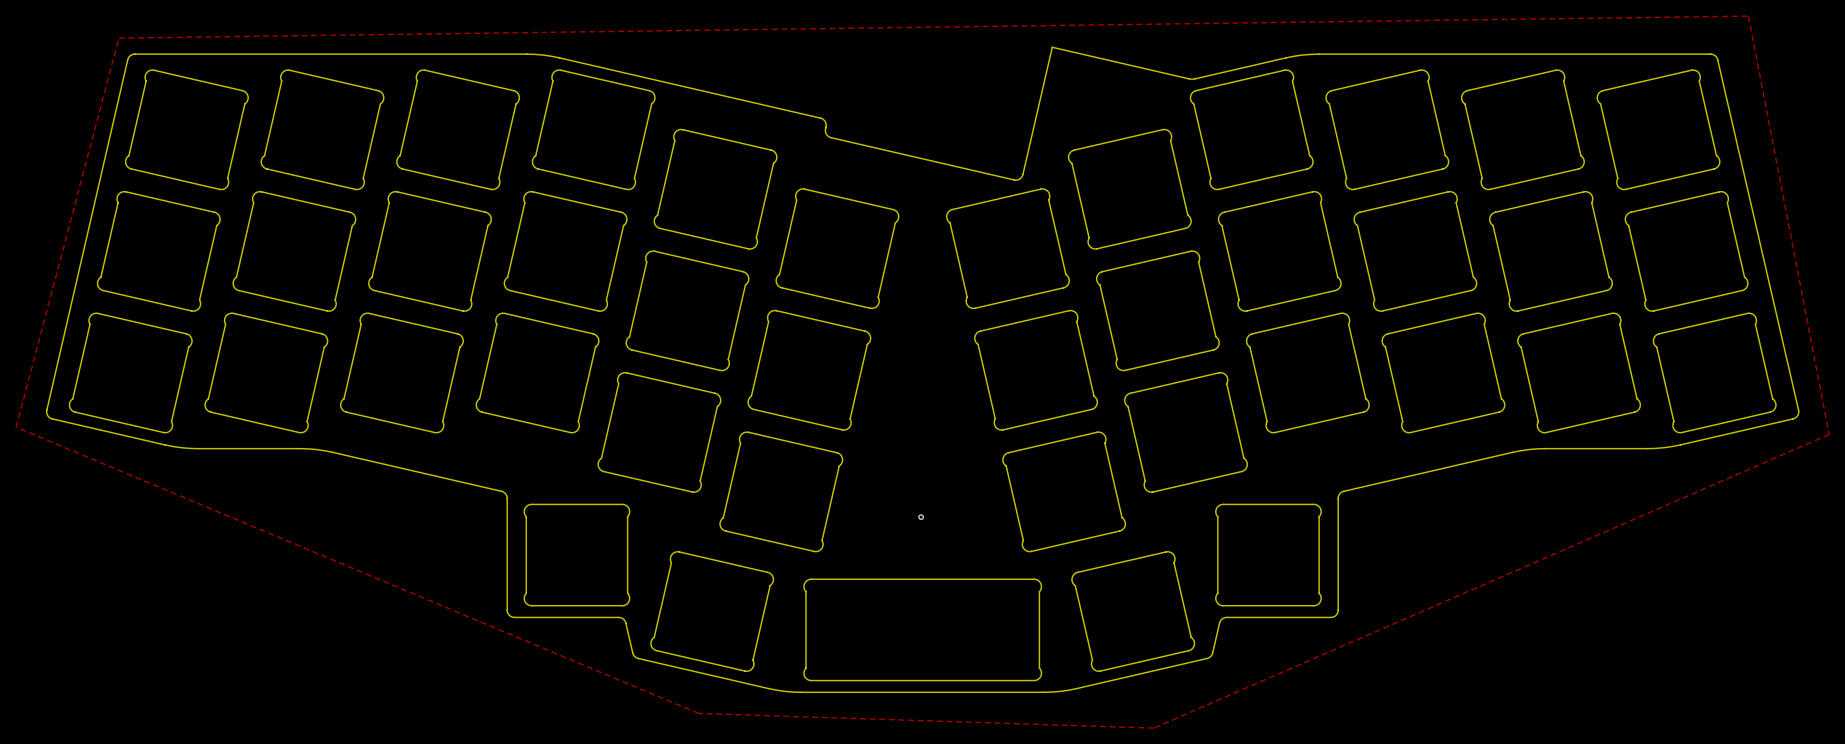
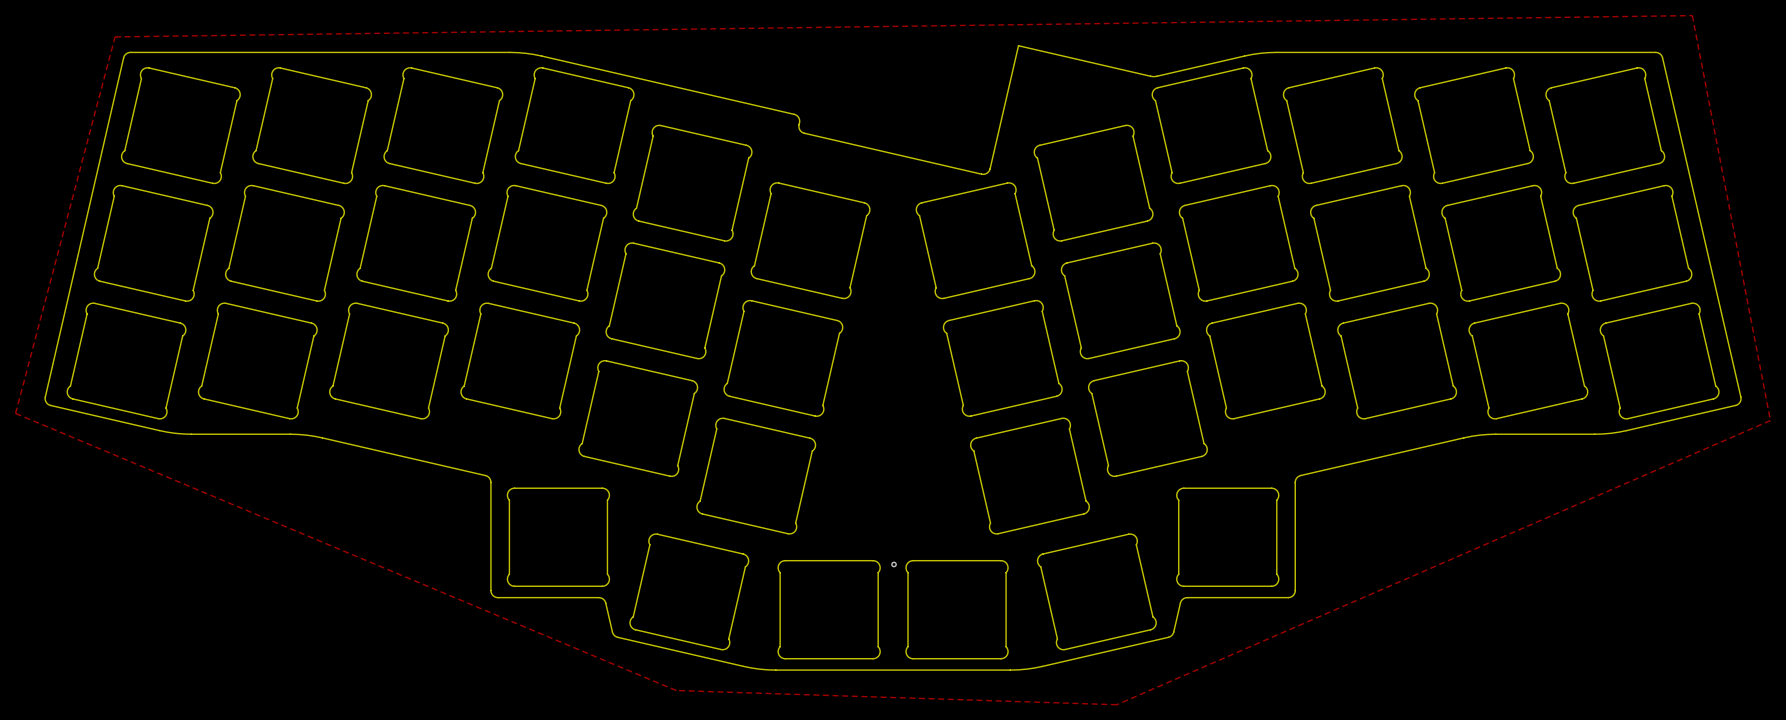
drawing shape: [45, 46, 1800, 694] -> [44, 45, 1742, 671]
via: (921, 517) -> none
via: none -> (894, 564)

